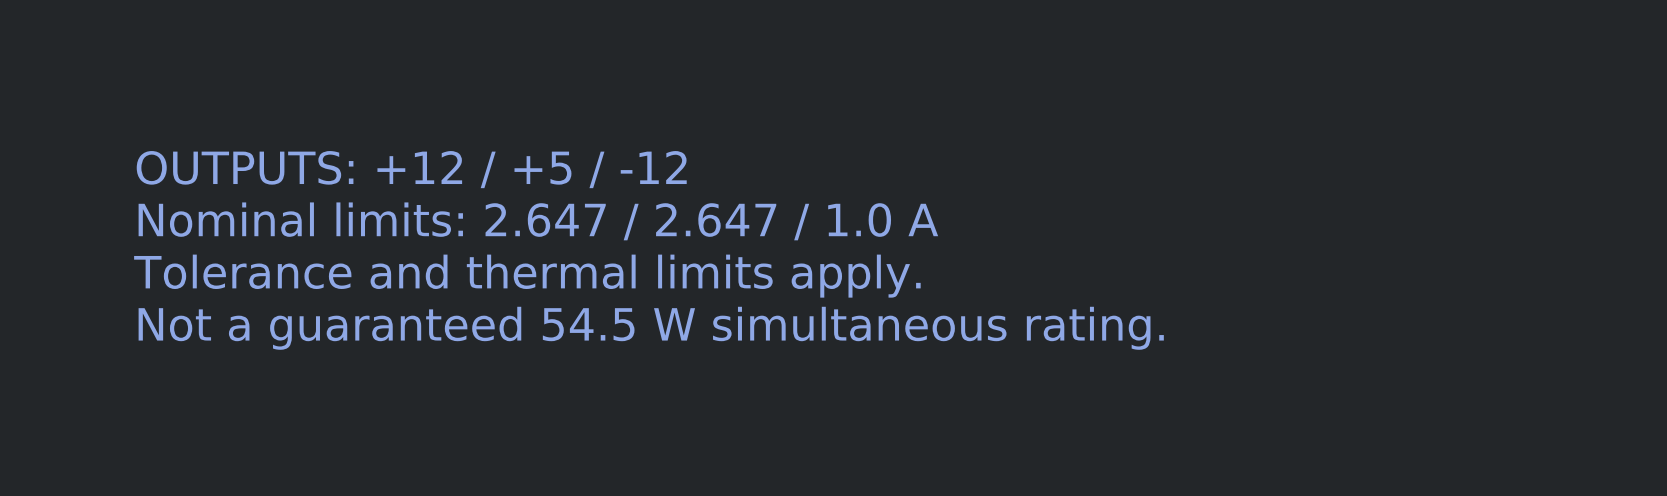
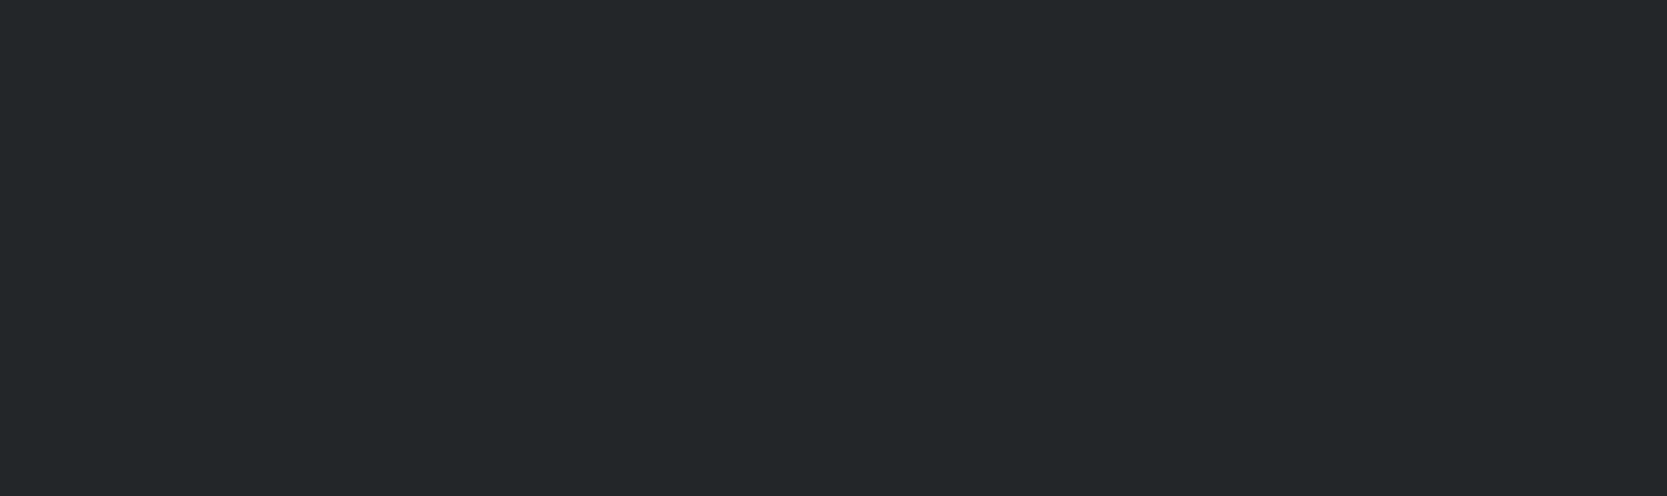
text: OUTPUTS: +12 / +5 / -12 (411, 169) -> none
text: Nominal limits: 2.647 / 2.647 / 1.0 A (538, 221) -> none
text: Tolerance and thermal limits apply. (527, 276) -> none
text: Not a guaranteed 54.5 W simultaneous rating. (651, 328) -> none

